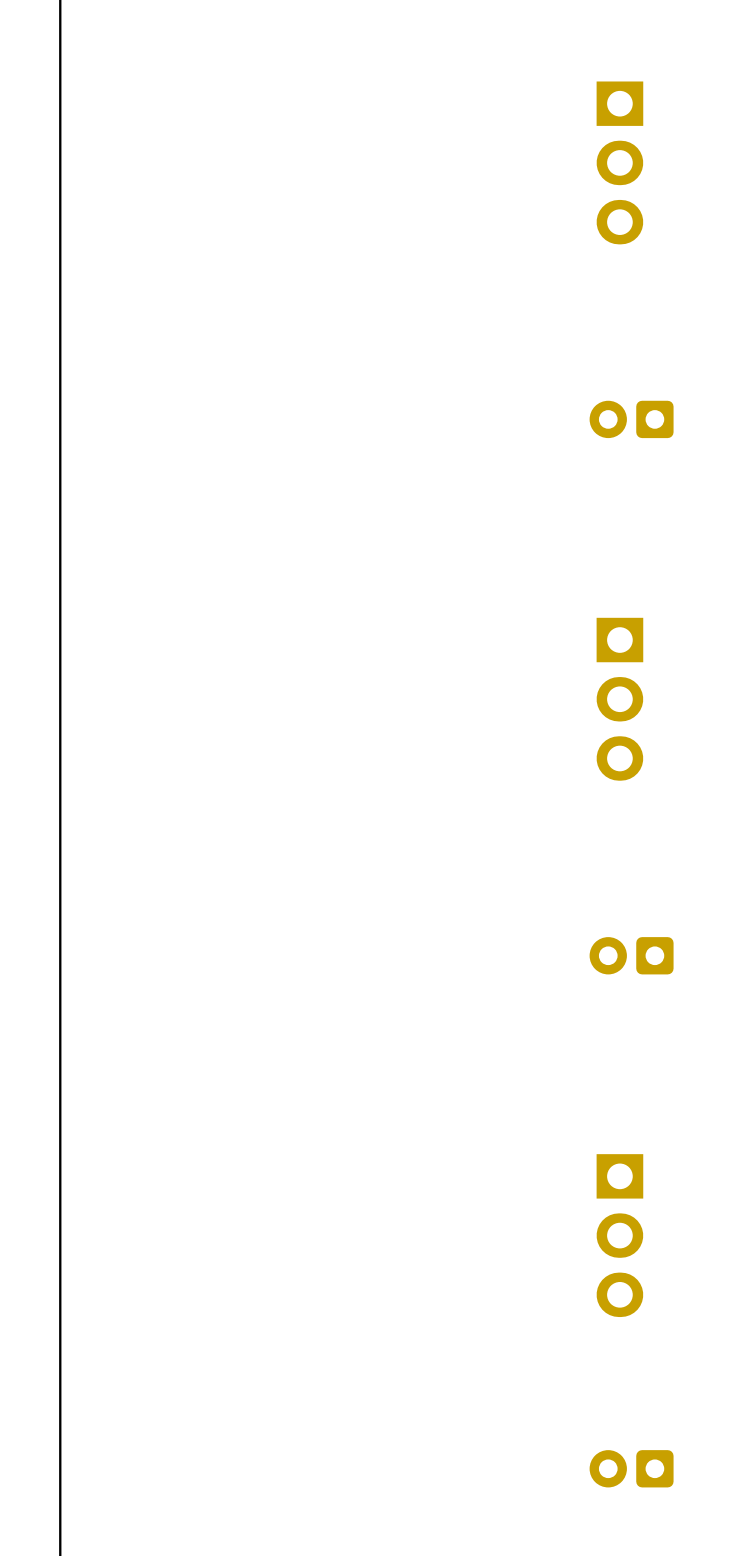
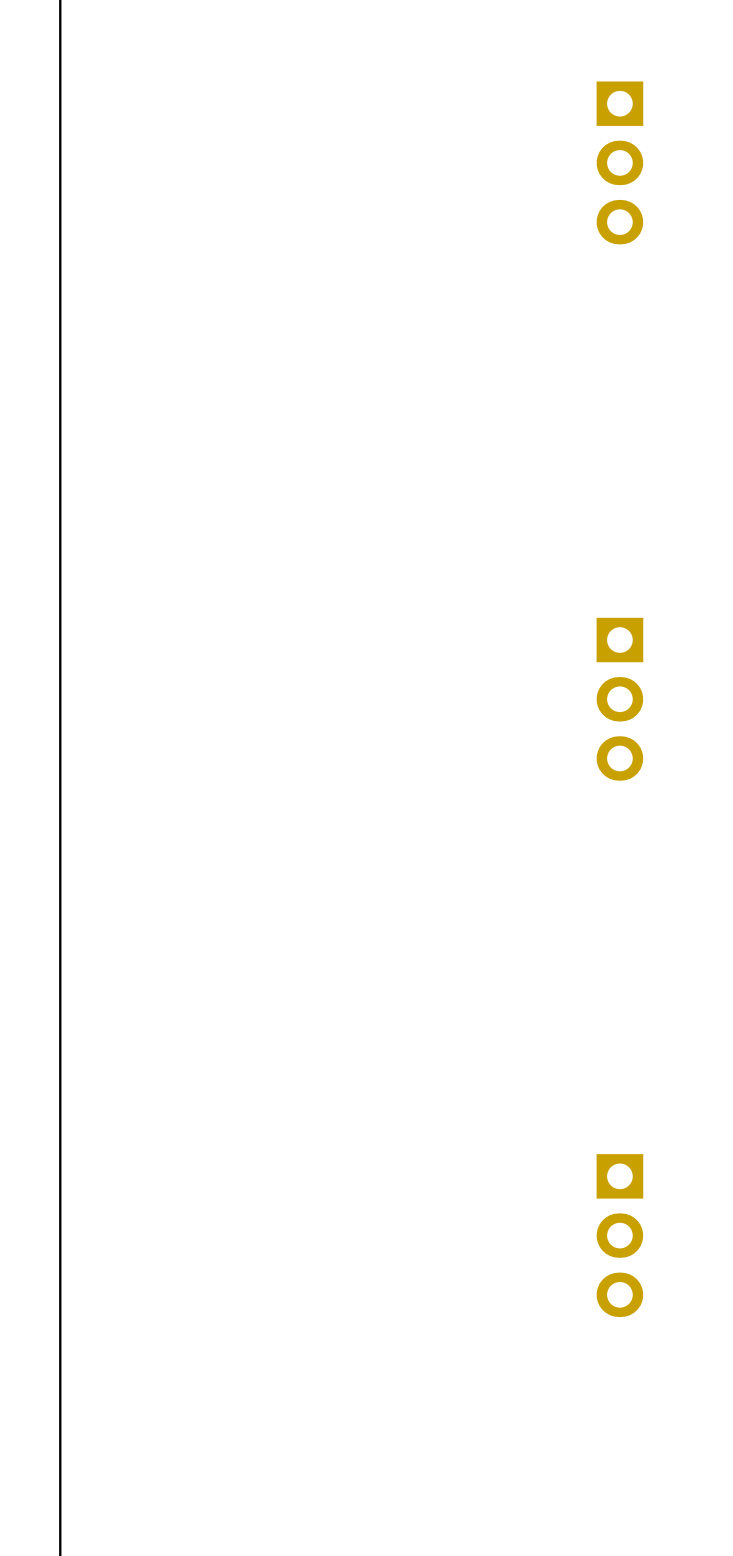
part: (631, 419) -> none
part: (631, 955) -> none
part: (631, 1468) -> none

